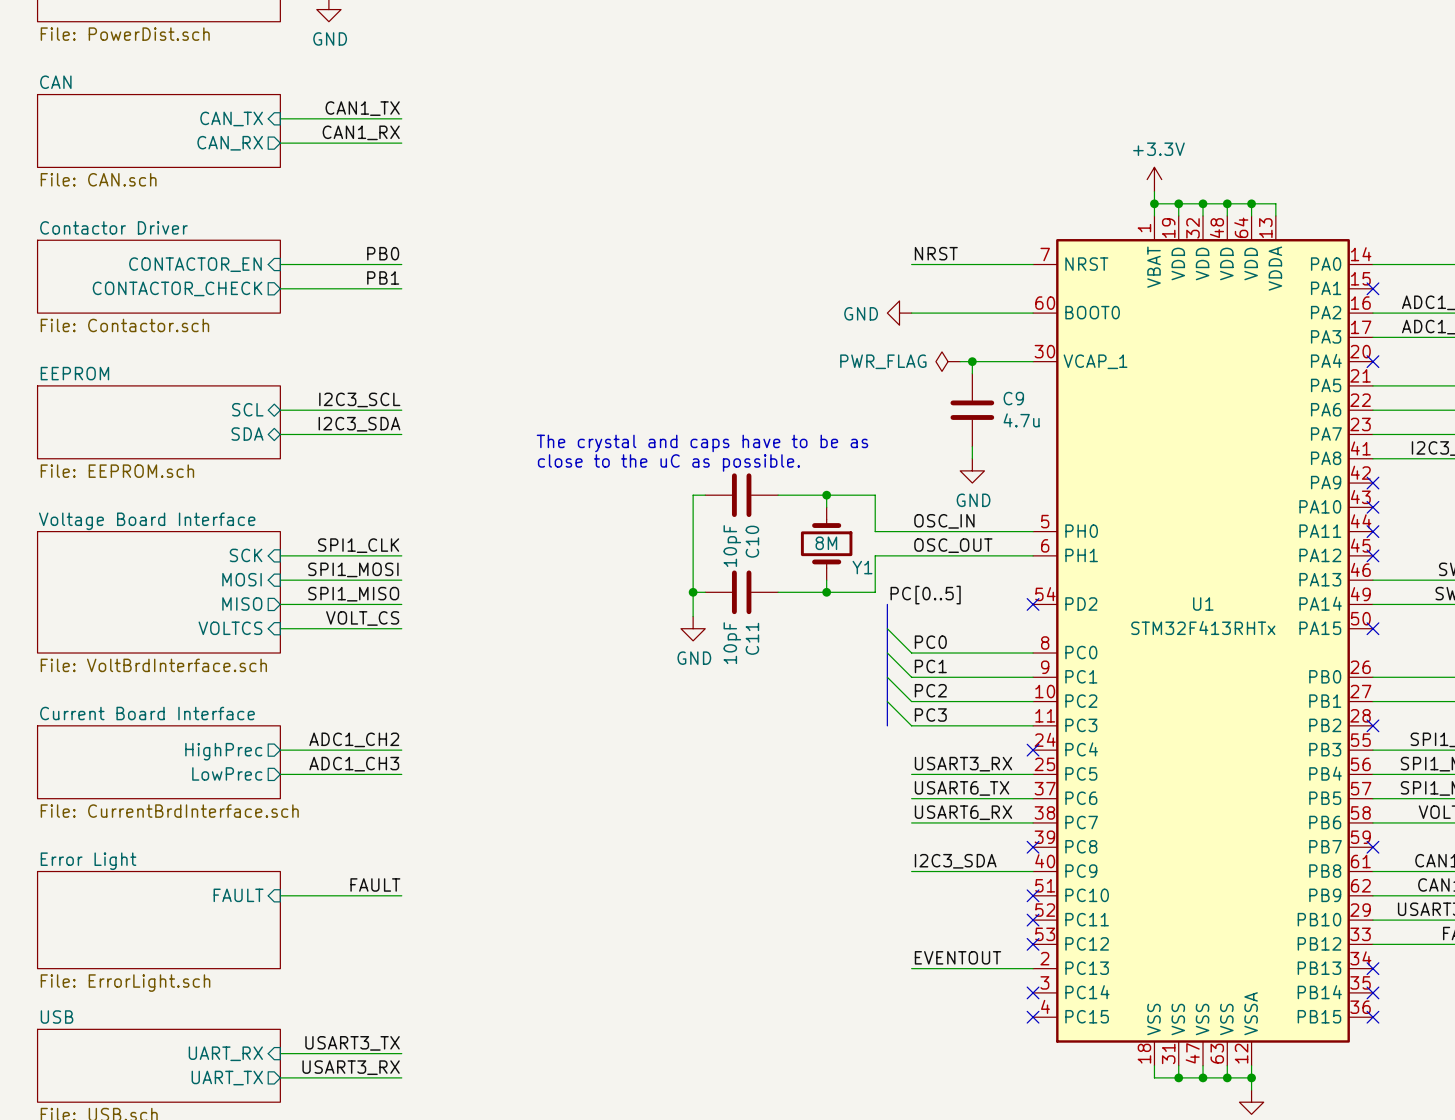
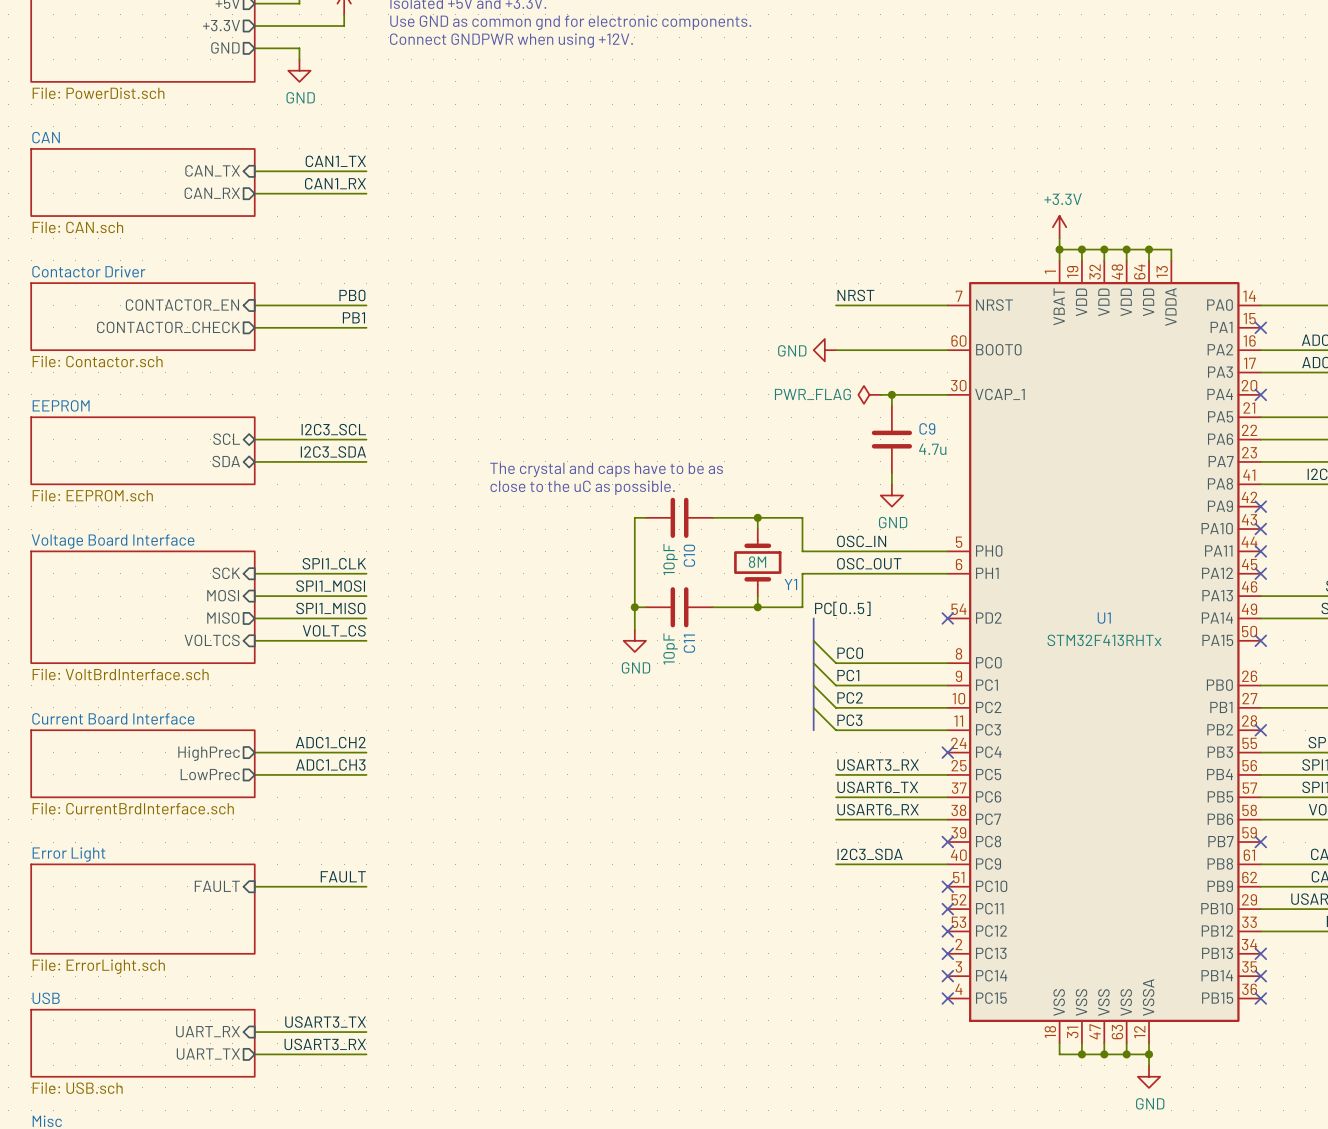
label: EVENTOUT (957, 957) -> none
wire: (911, 968) (1033, 968) -> none
no-connect mark: none -> (947, 953)

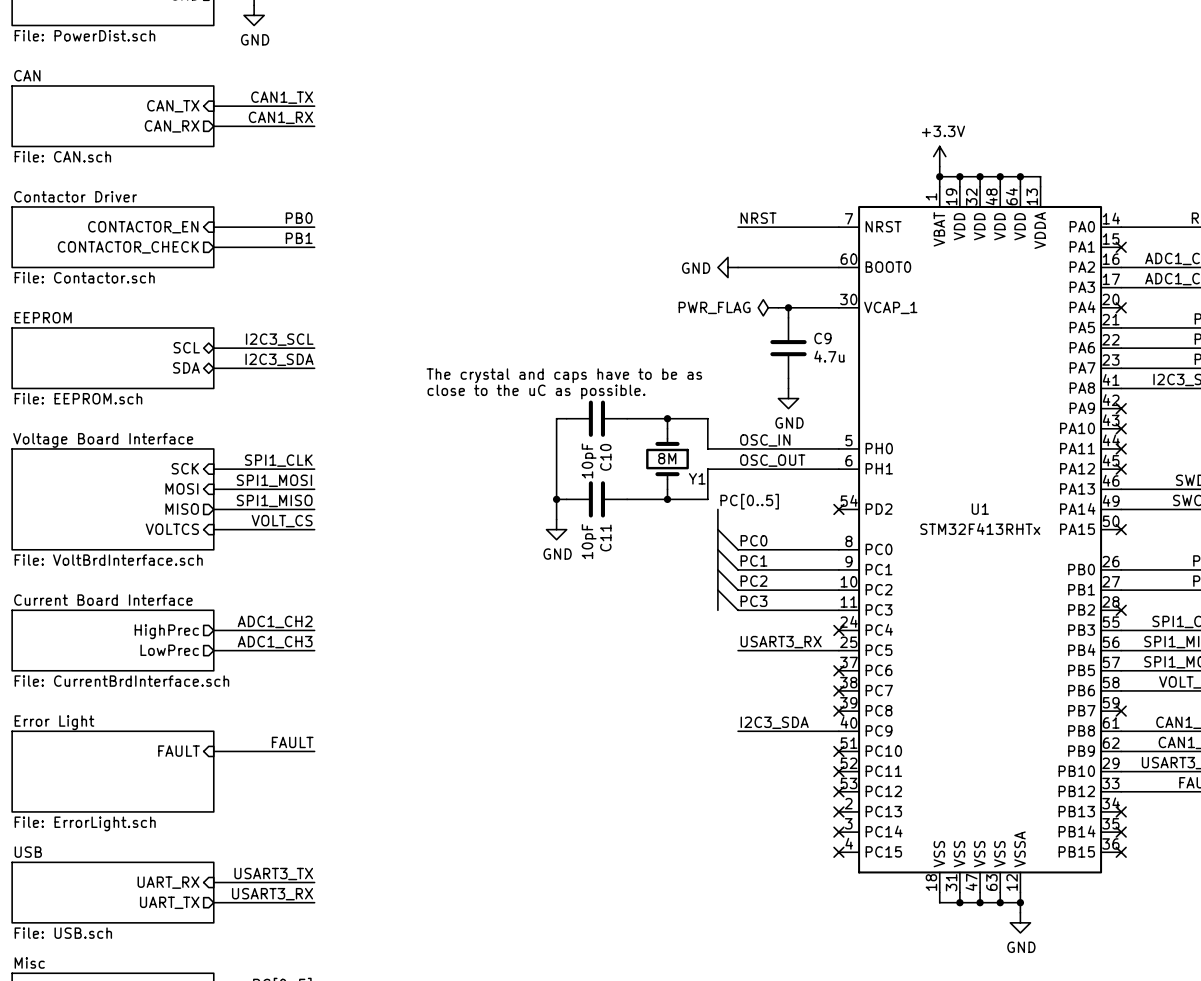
label: USART6_TX (877, 787) -> none
wire: (836, 797) (947, 797) -> none
no-connect mark: none -> (838, 670)
label: USART6_RX (878, 809) -> none
wire: (836, 819) (947, 819) -> none
no-connect mark: none -> (838, 690)

